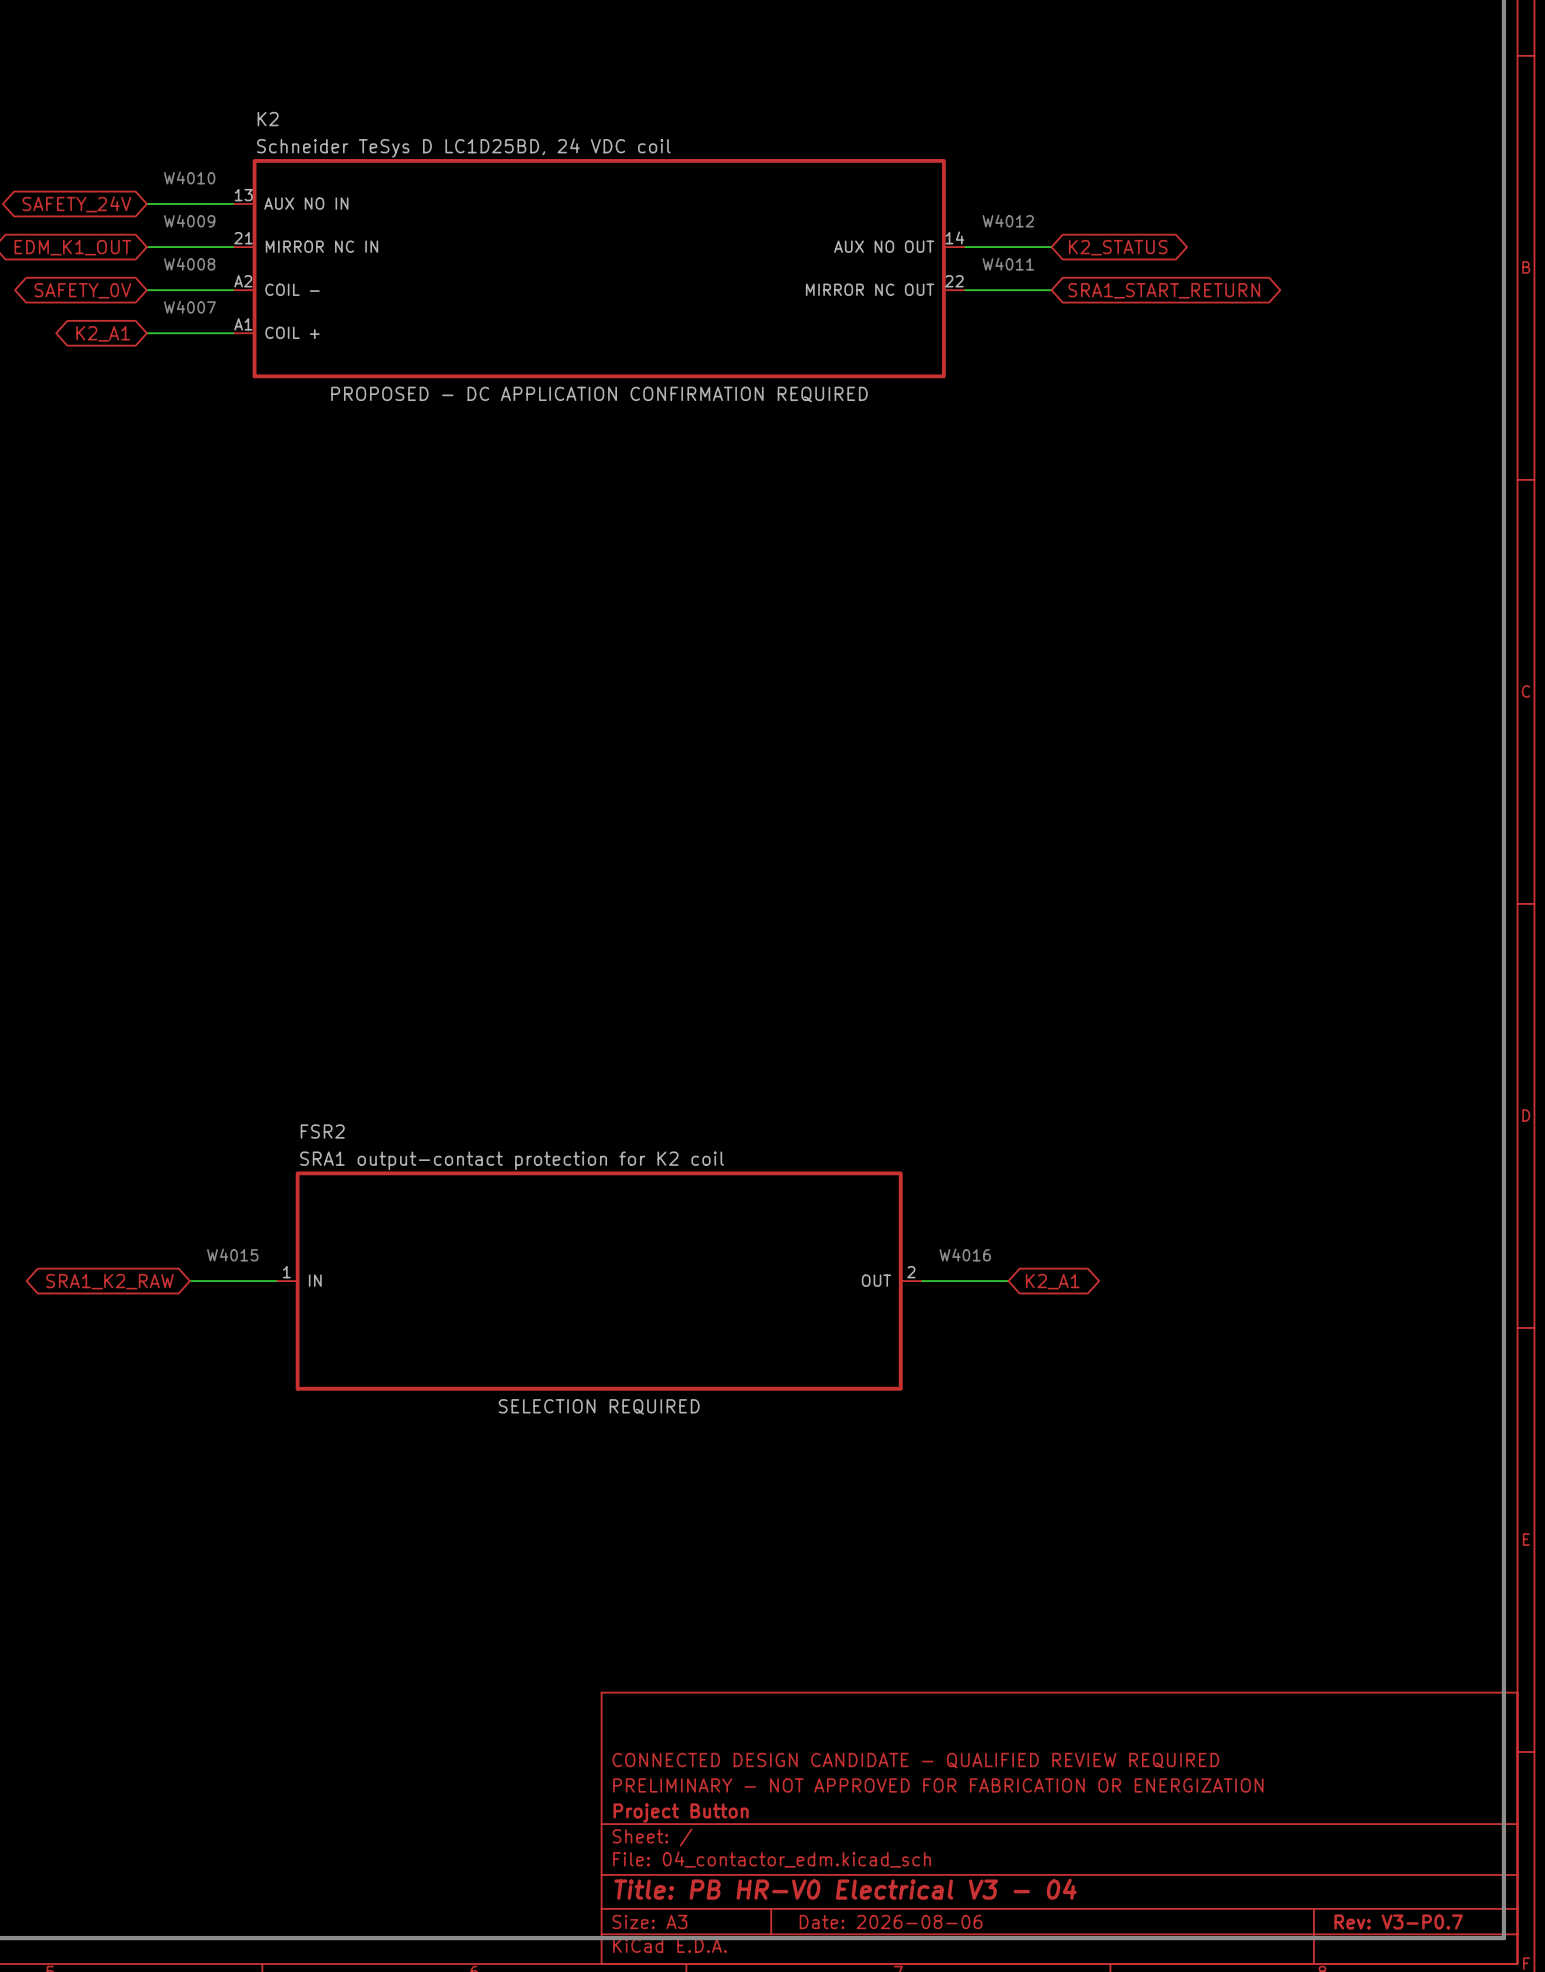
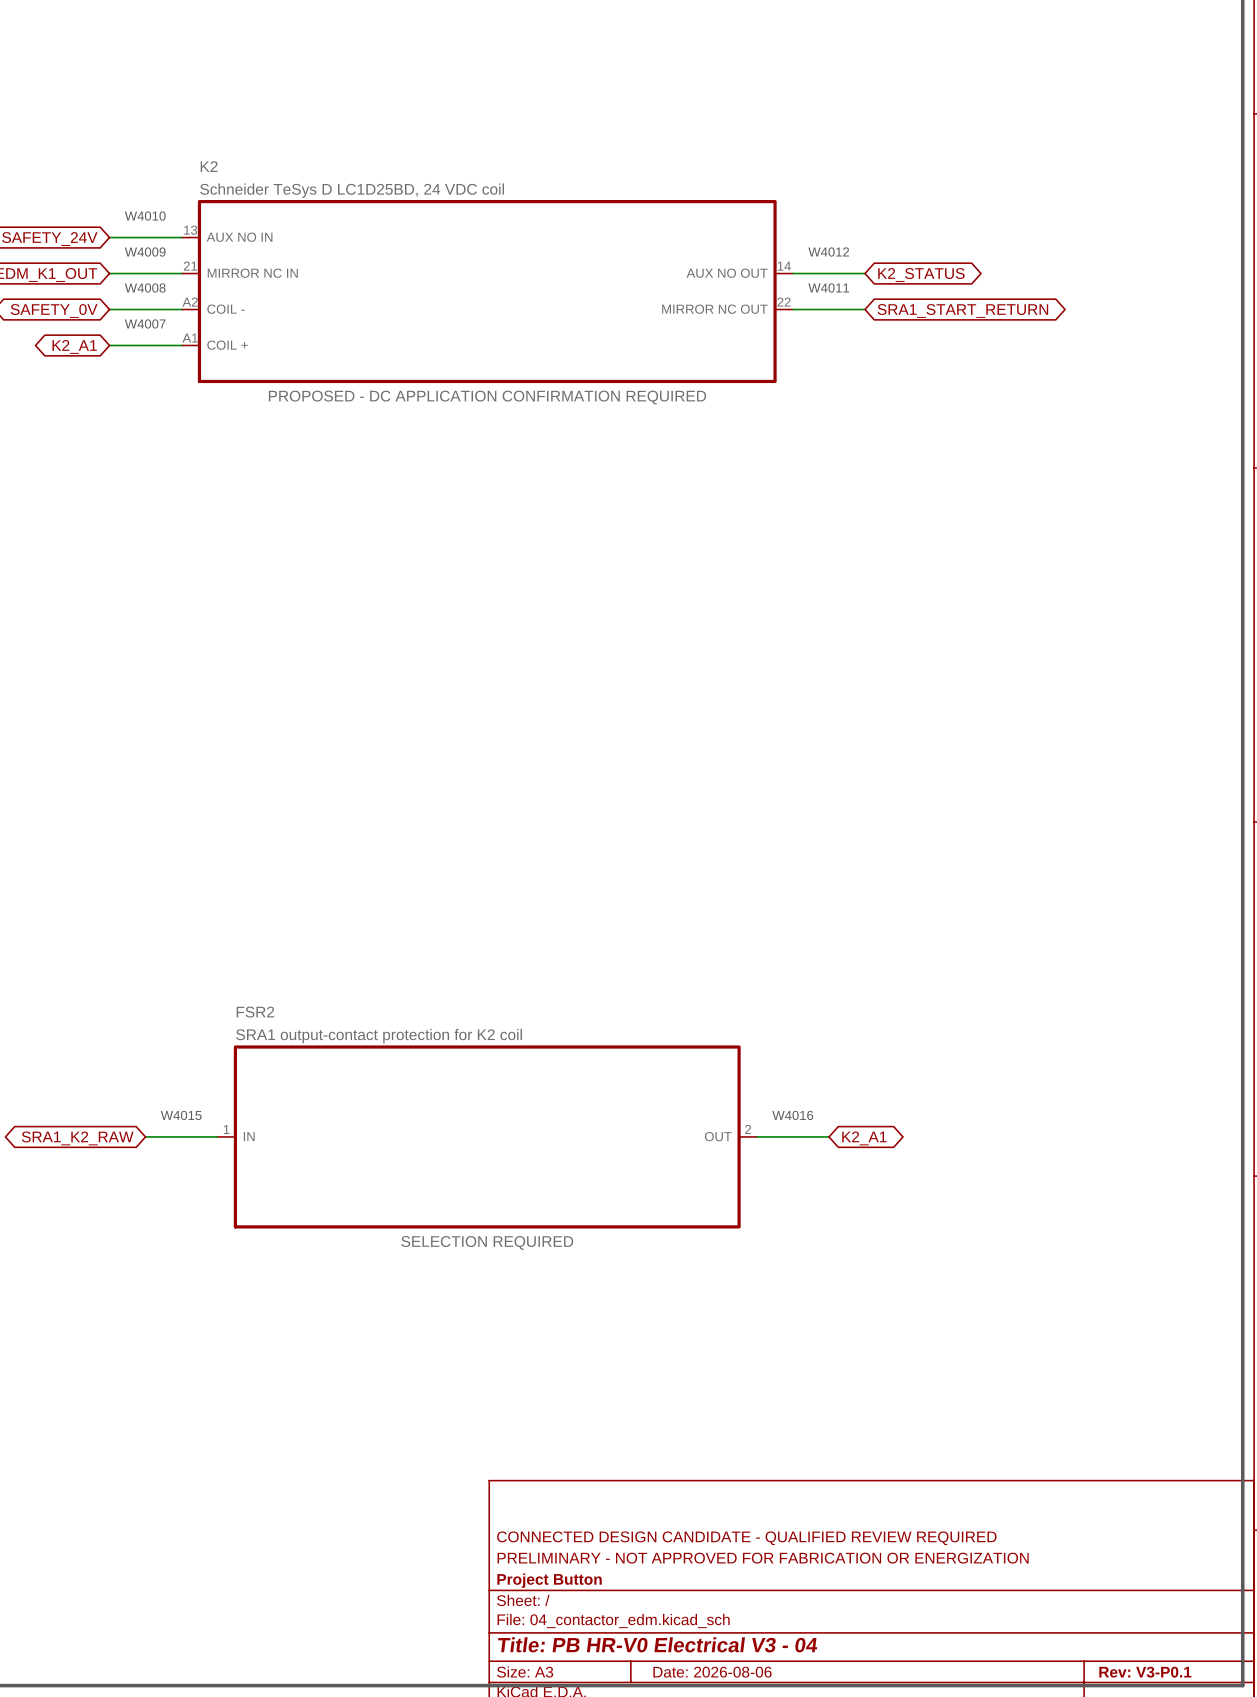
title block: Rev: V3-P0.7 (1398, 1921) -> Rev: V3-P0.1 (1145, 1672)

